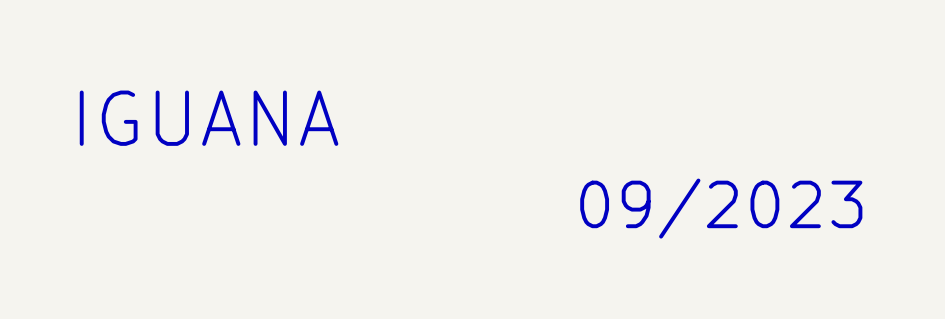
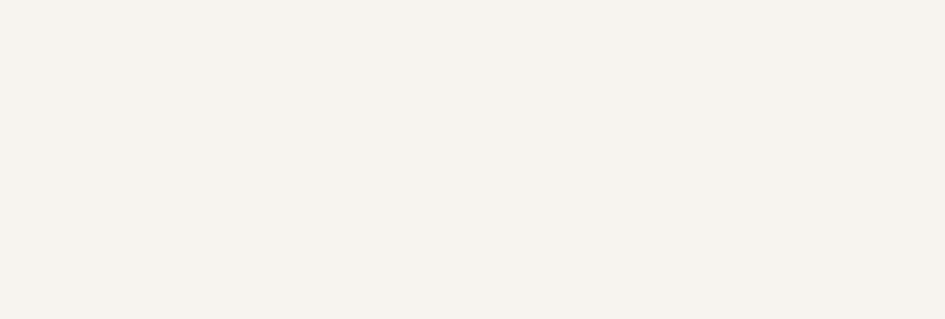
text: IGUANA (209, 118) -> none
text: 09/2023 (721, 208) -> none

